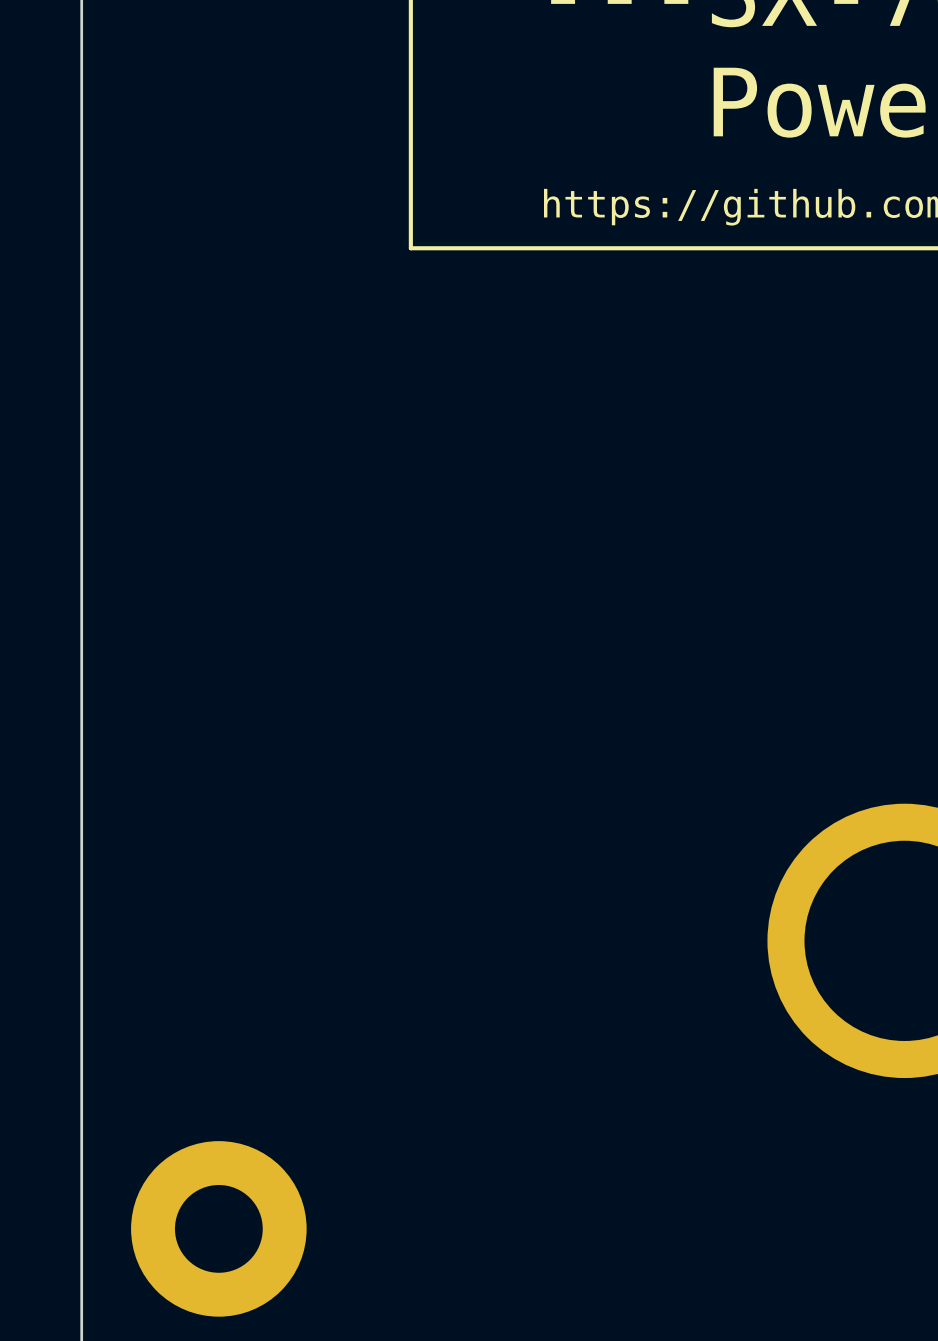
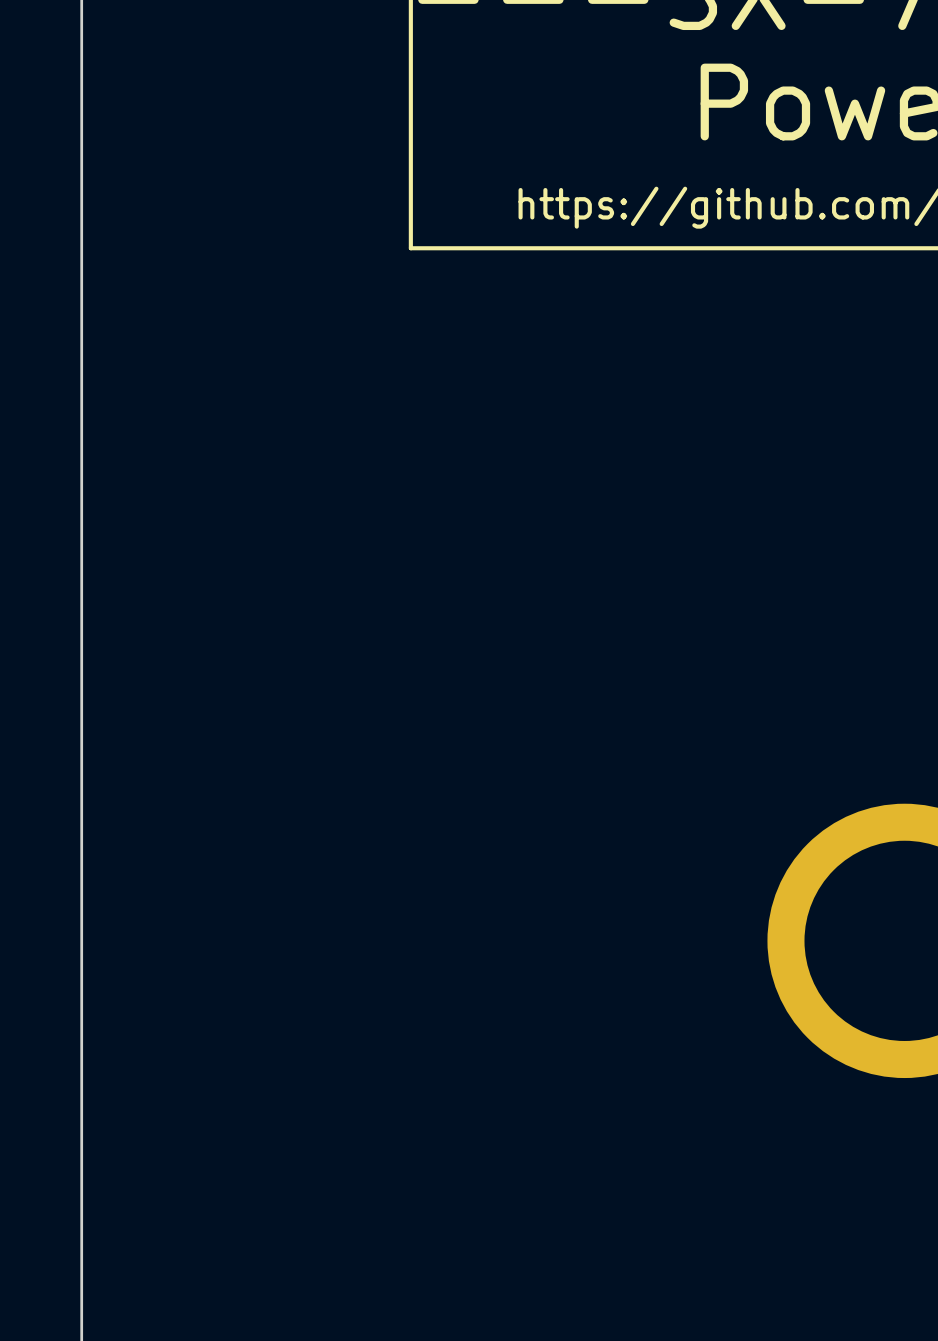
part: (218, 1228) -> none

